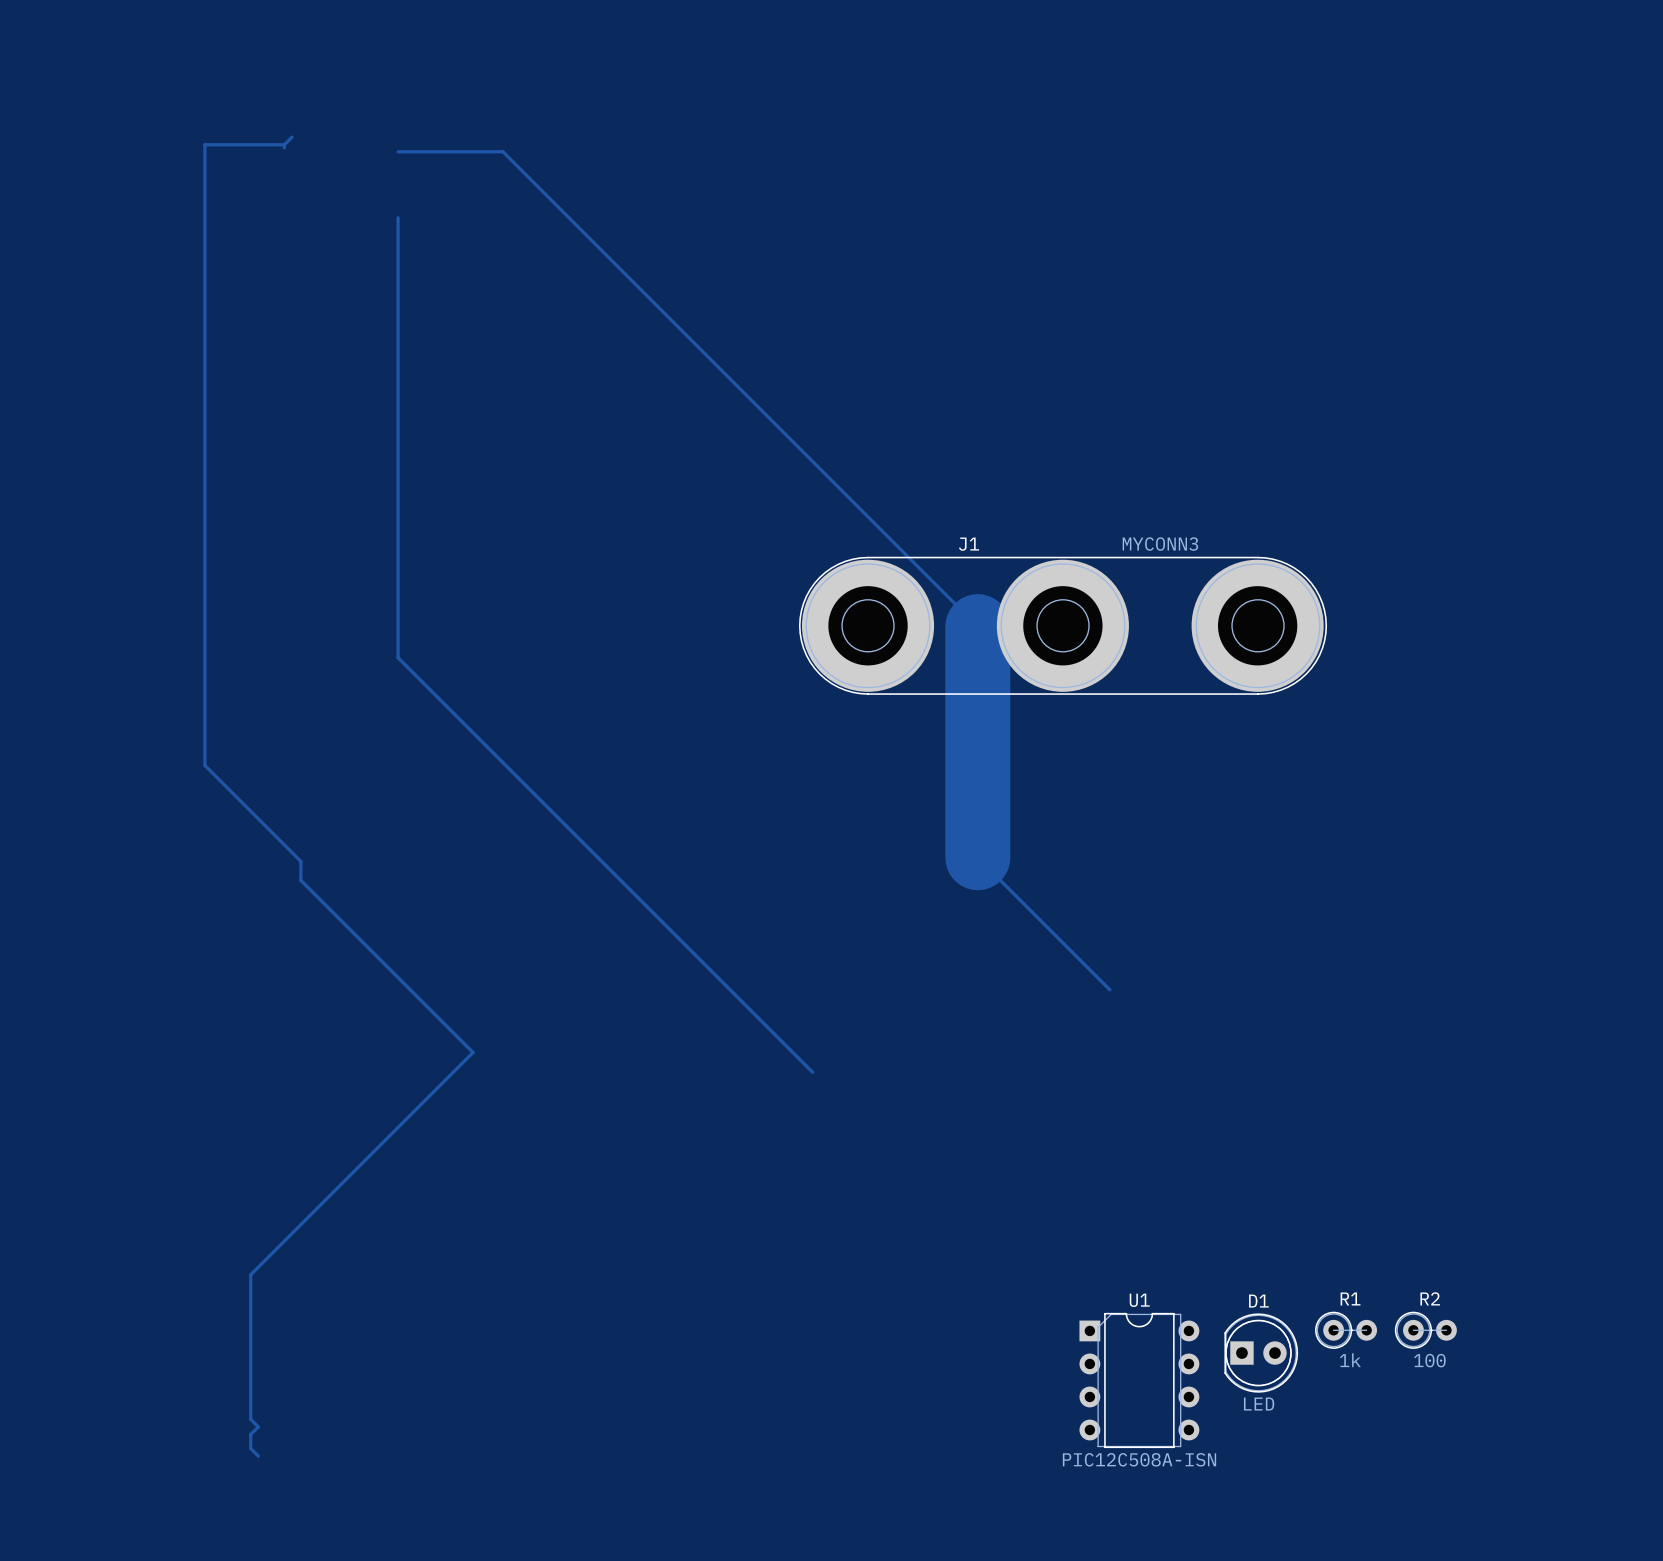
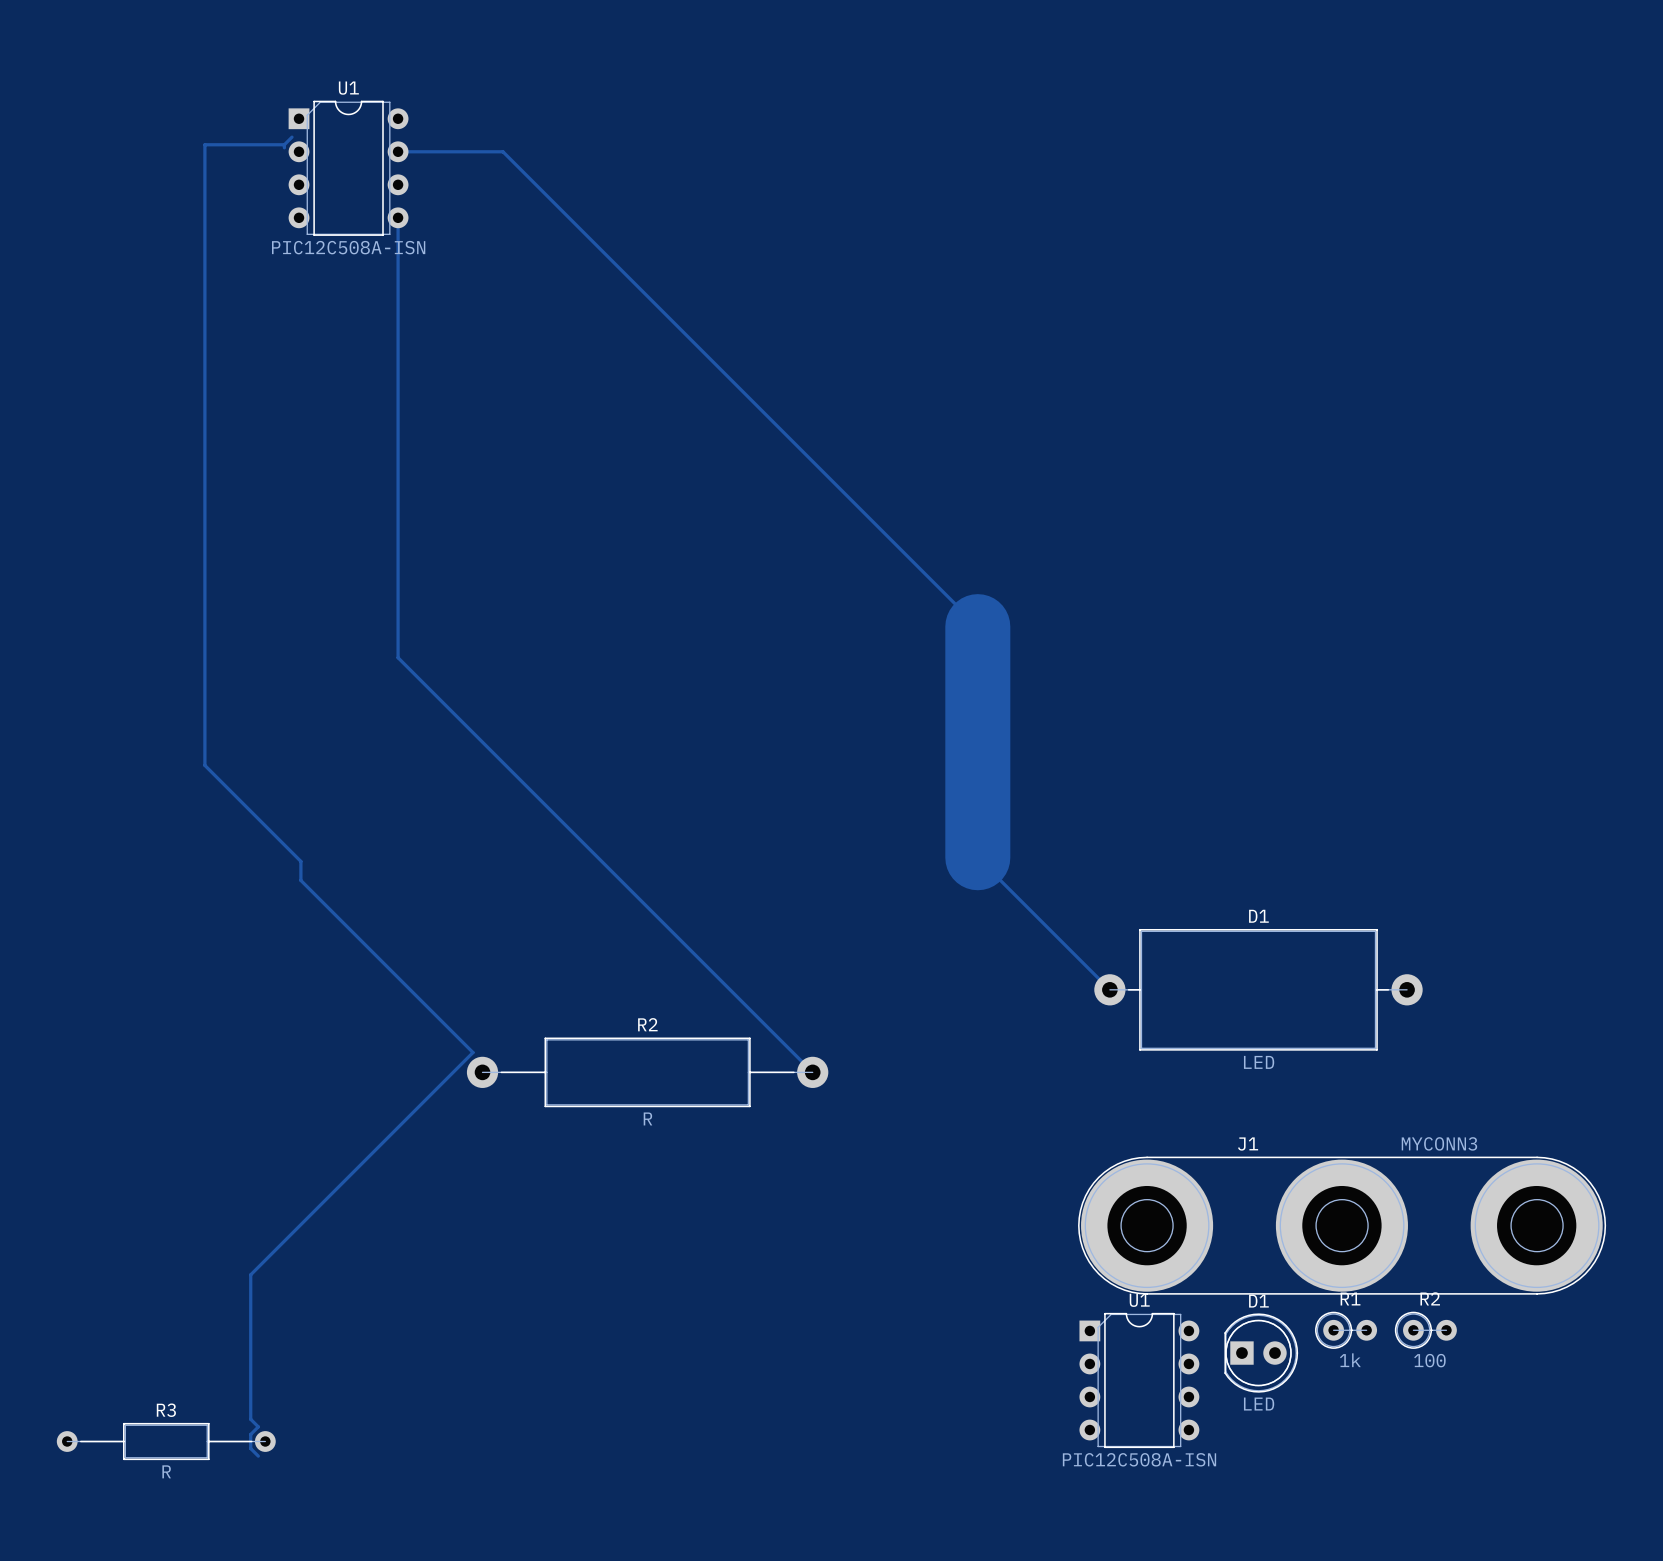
U1: none -> PIC12C508A-ISN (348, 168)
J1 position: (1063, 625) -> (1342, 1225)
D1: none -> LED (1258, 989)
R2: none -> R (647, 1072)
R3: none -> R (166, 1441)

